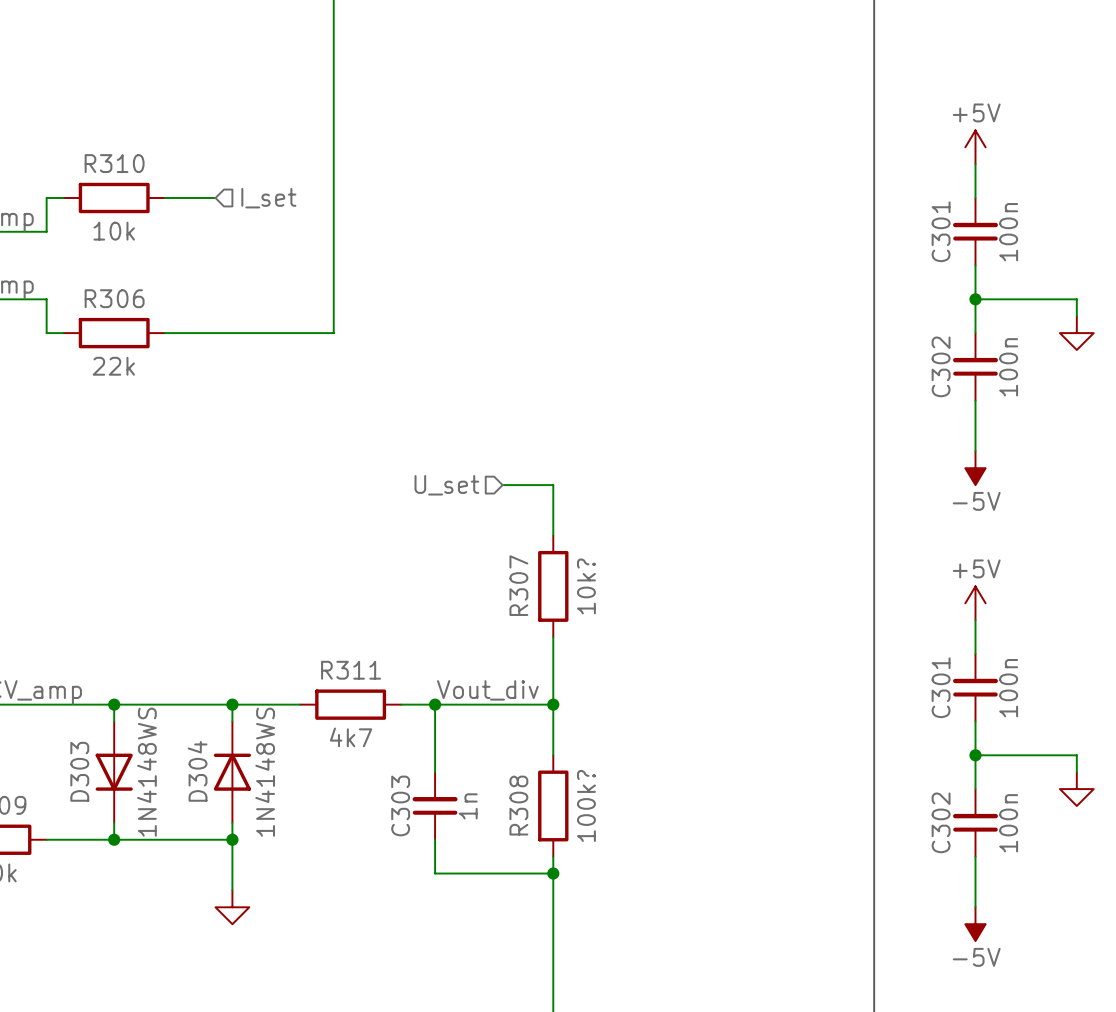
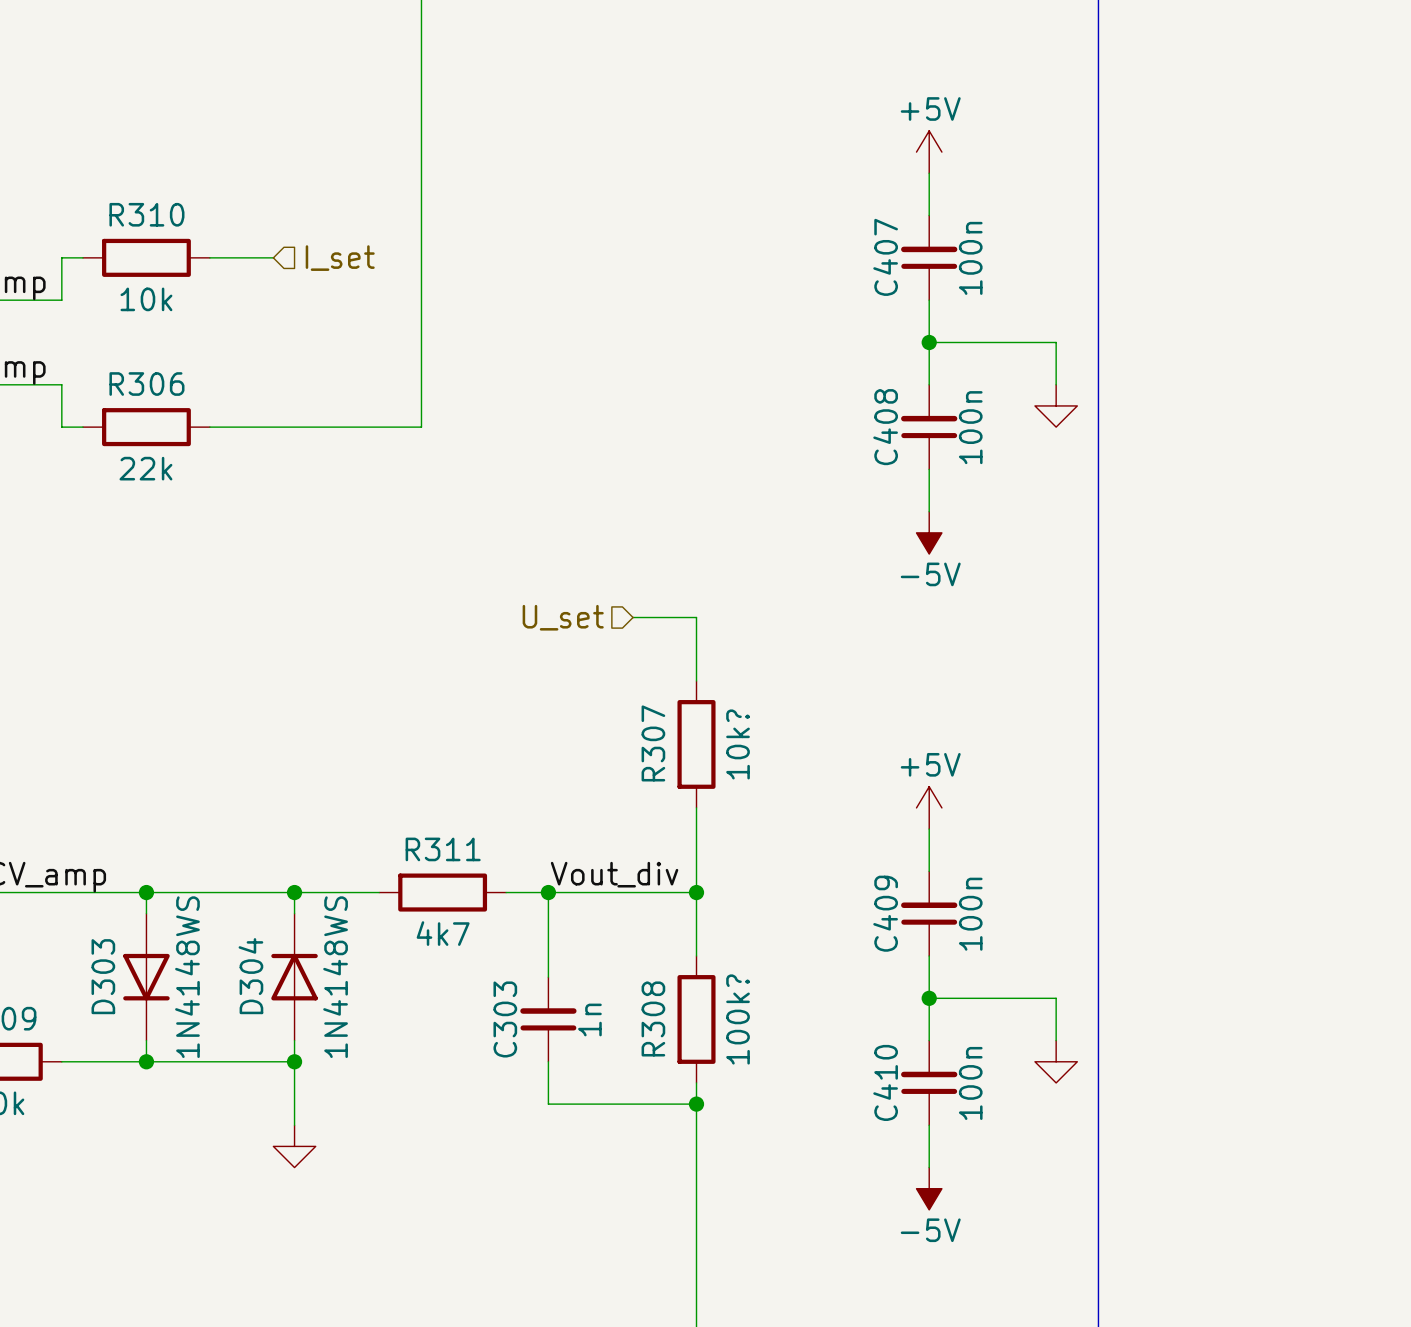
power symbol position: +5V (975, 147) -> +5V (929, 152)
wire: (975, 164) (975, 198) -> (929, 173) (929, 215)
C407: none -> 100n (929, 257)
C301: 100n (975, 231) -> none
wire: none -> (929, 342) (1056, 342) (1056, 384)
junction: none -> (929, 342)
wire: (975, 265) (975, 333) -> (929, 300) (929, 384)
wire: (975, 299) (1076, 299) (1076, 316) -> none
junction: (975, 299) -> none
C408: none -> 100n (929, 427)
power symbol position: (1076, 333) -> (1056, 405)
wire: none -> (929, 469) (929, 511)
C302: 100n (975, 366) -> none
wire: (975, 400) (975, 451) -> none
power symbol position: -5V (975, 468) -> -5V (929, 532)
power symbol position: +5V (975, 603) -> +5V (929, 807)
wire: (975, 620) (975, 653) -> (929, 829) (929, 871)
C301: 100n (975, 687) -> none
C409: none -> 100n (929, 913)
wire: (975, 721) (975, 789) -> (929, 956) (929, 1040)
wire: (975, 755) (1076, 755) (1076, 772) -> none
junction: (975, 755) -> none
wire: none -> (929, 998) (1056, 998) (1056, 1040)
junction: none -> (929, 998)
power symbol position: (1076, 789) -> (1056, 1061)
C302: 100n (975, 822) -> none
C410: none -> 100n (929, 1082)
wire: (975, 856) (975, 907) -> none
wire: none -> (929, 1125) (929, 1167)
power symbol position: -5V (975, 924) -> -5V (929, 1188)

